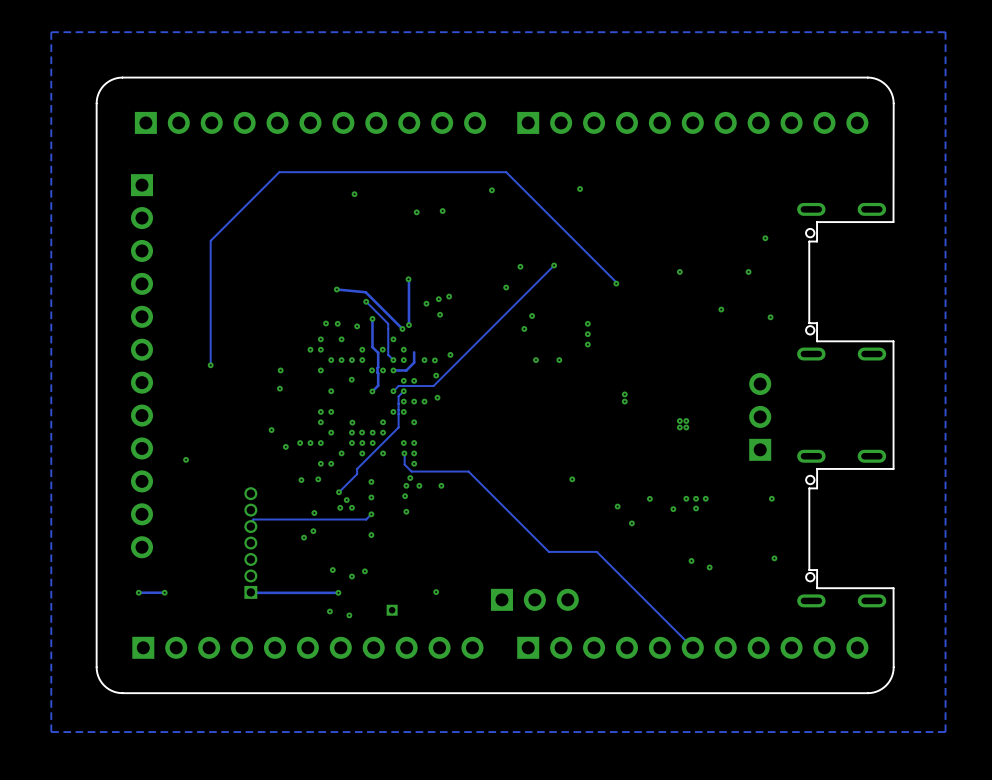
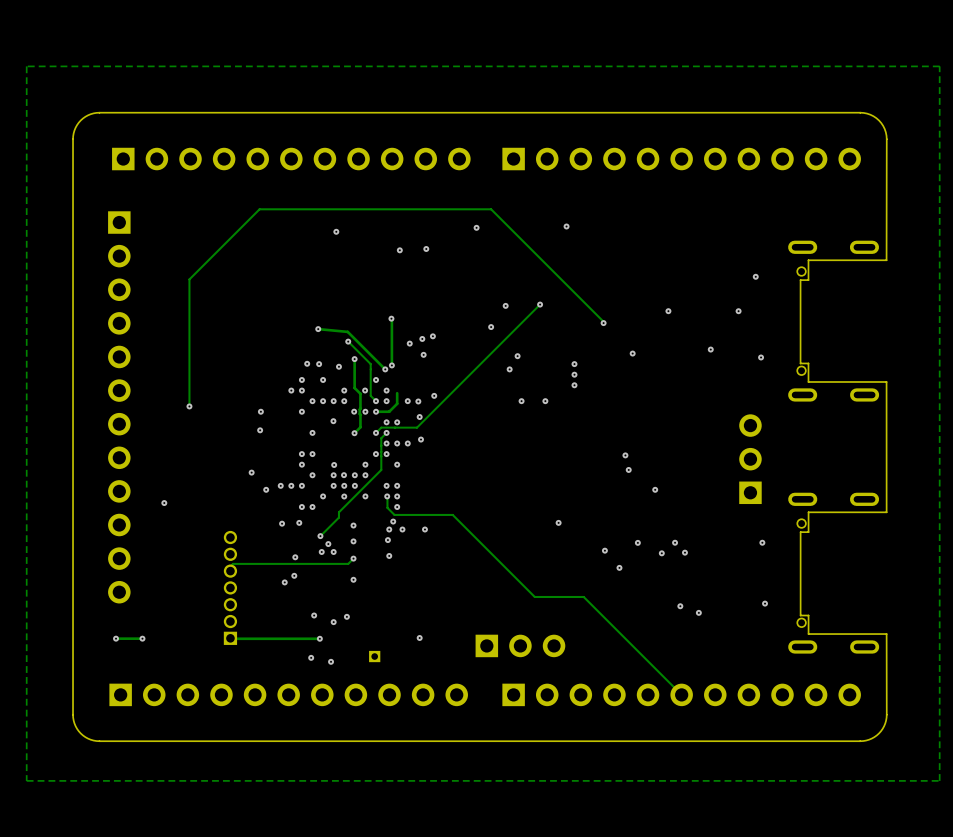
via: none -> (632, 353)
via: (624, 394) -> none
via: (624, 401) -> none
via: none -> (625, 455)
via: (679, 421) -> none
via: (686, 421) -> none
via: none -> (628, 469)
via: (679, 427) -> none
via: (686, 427) -> none
via: none -> (655, 489)
via: (696, 498) -> none
via: (705, 498) -> none

